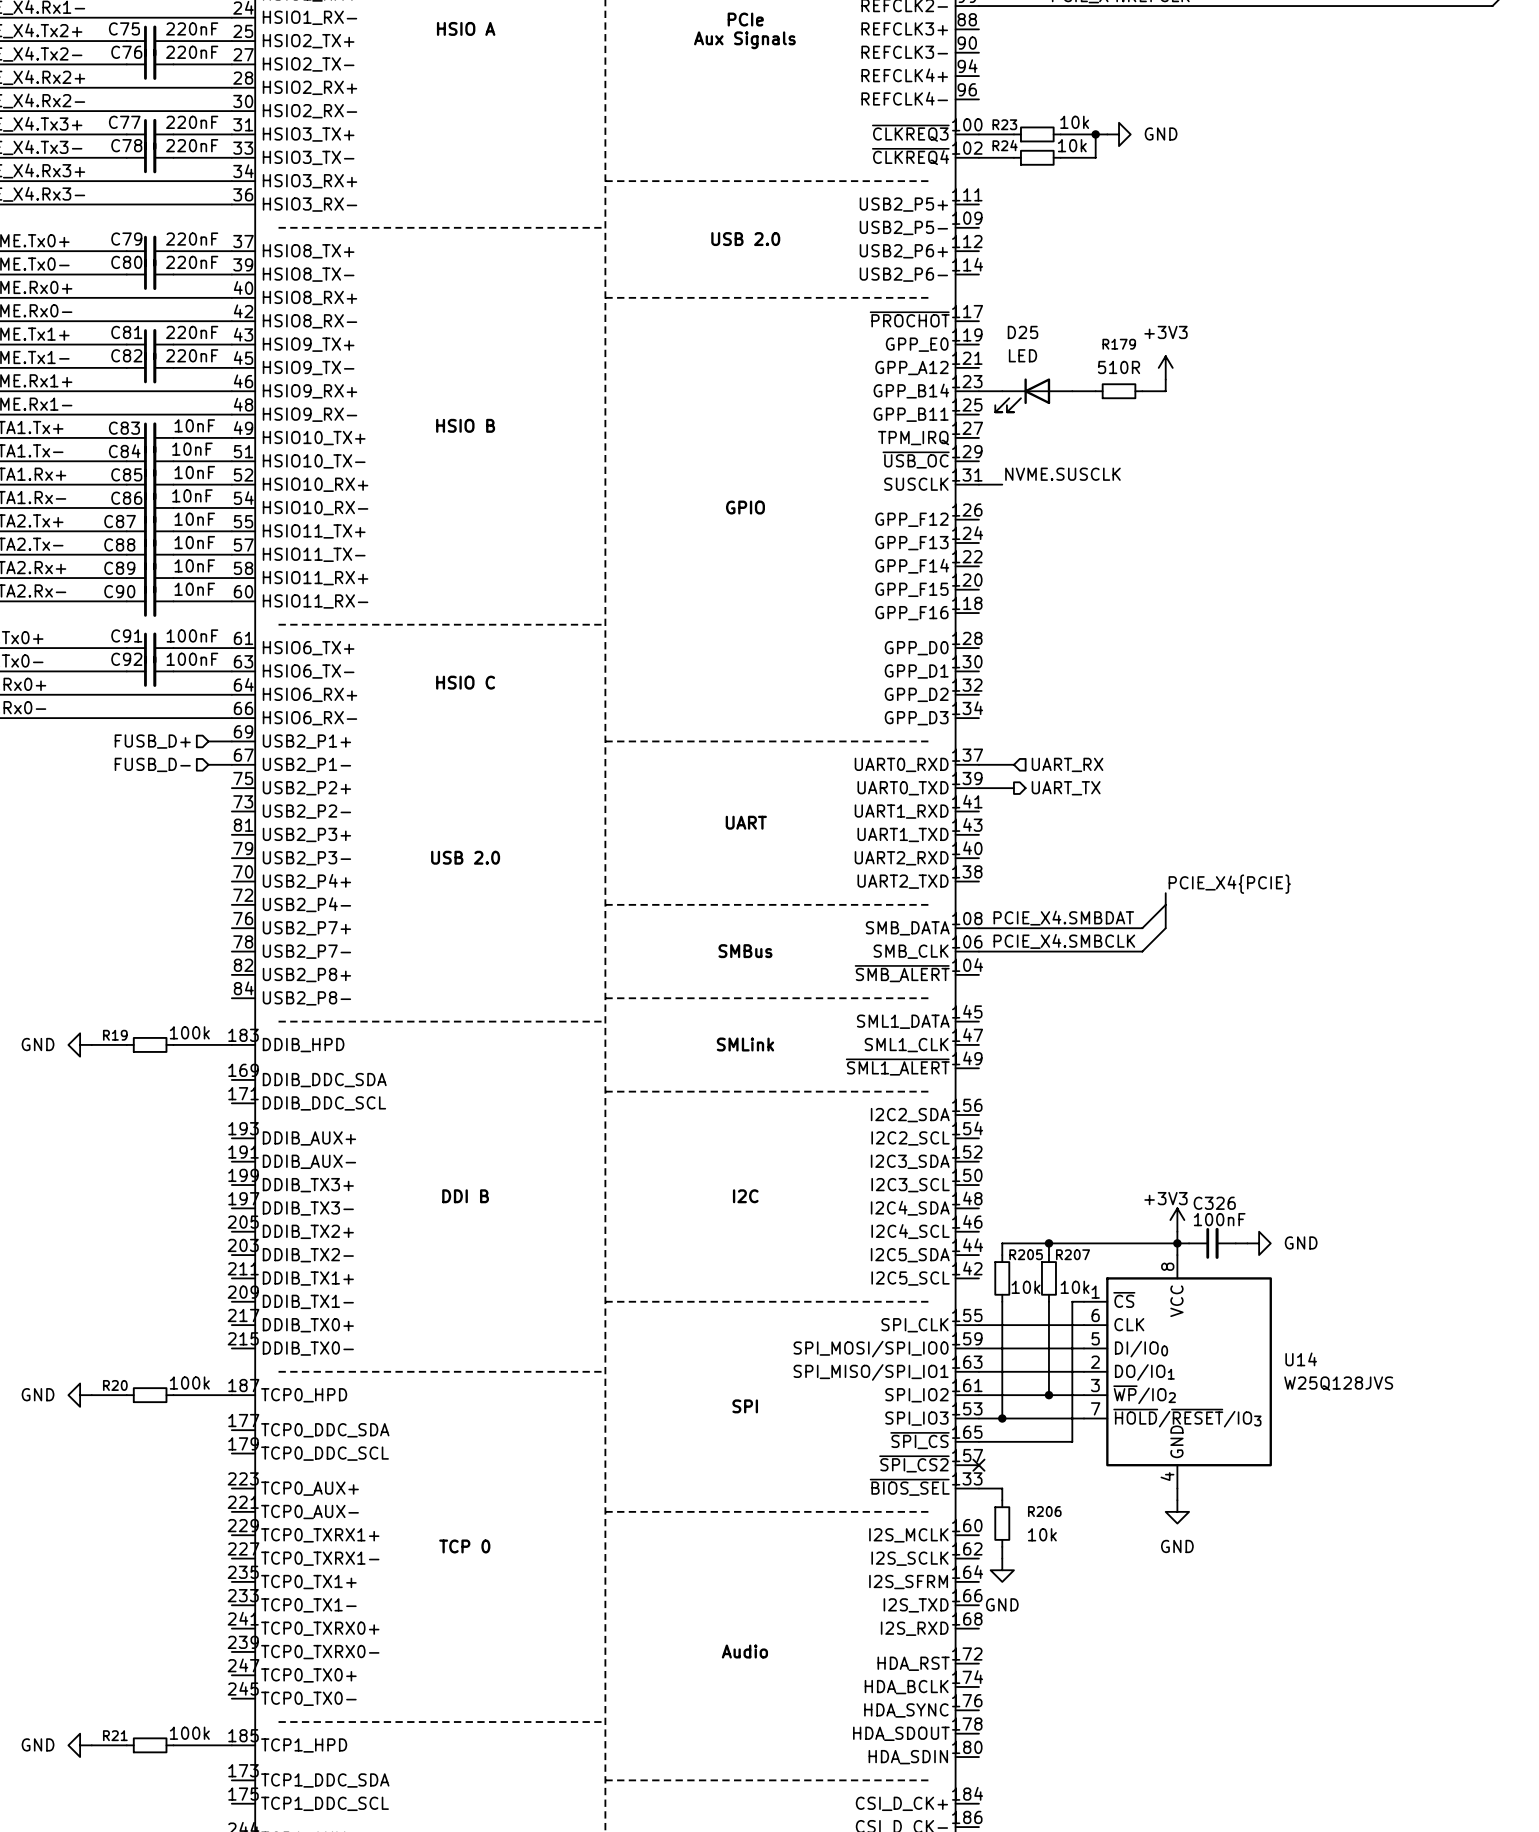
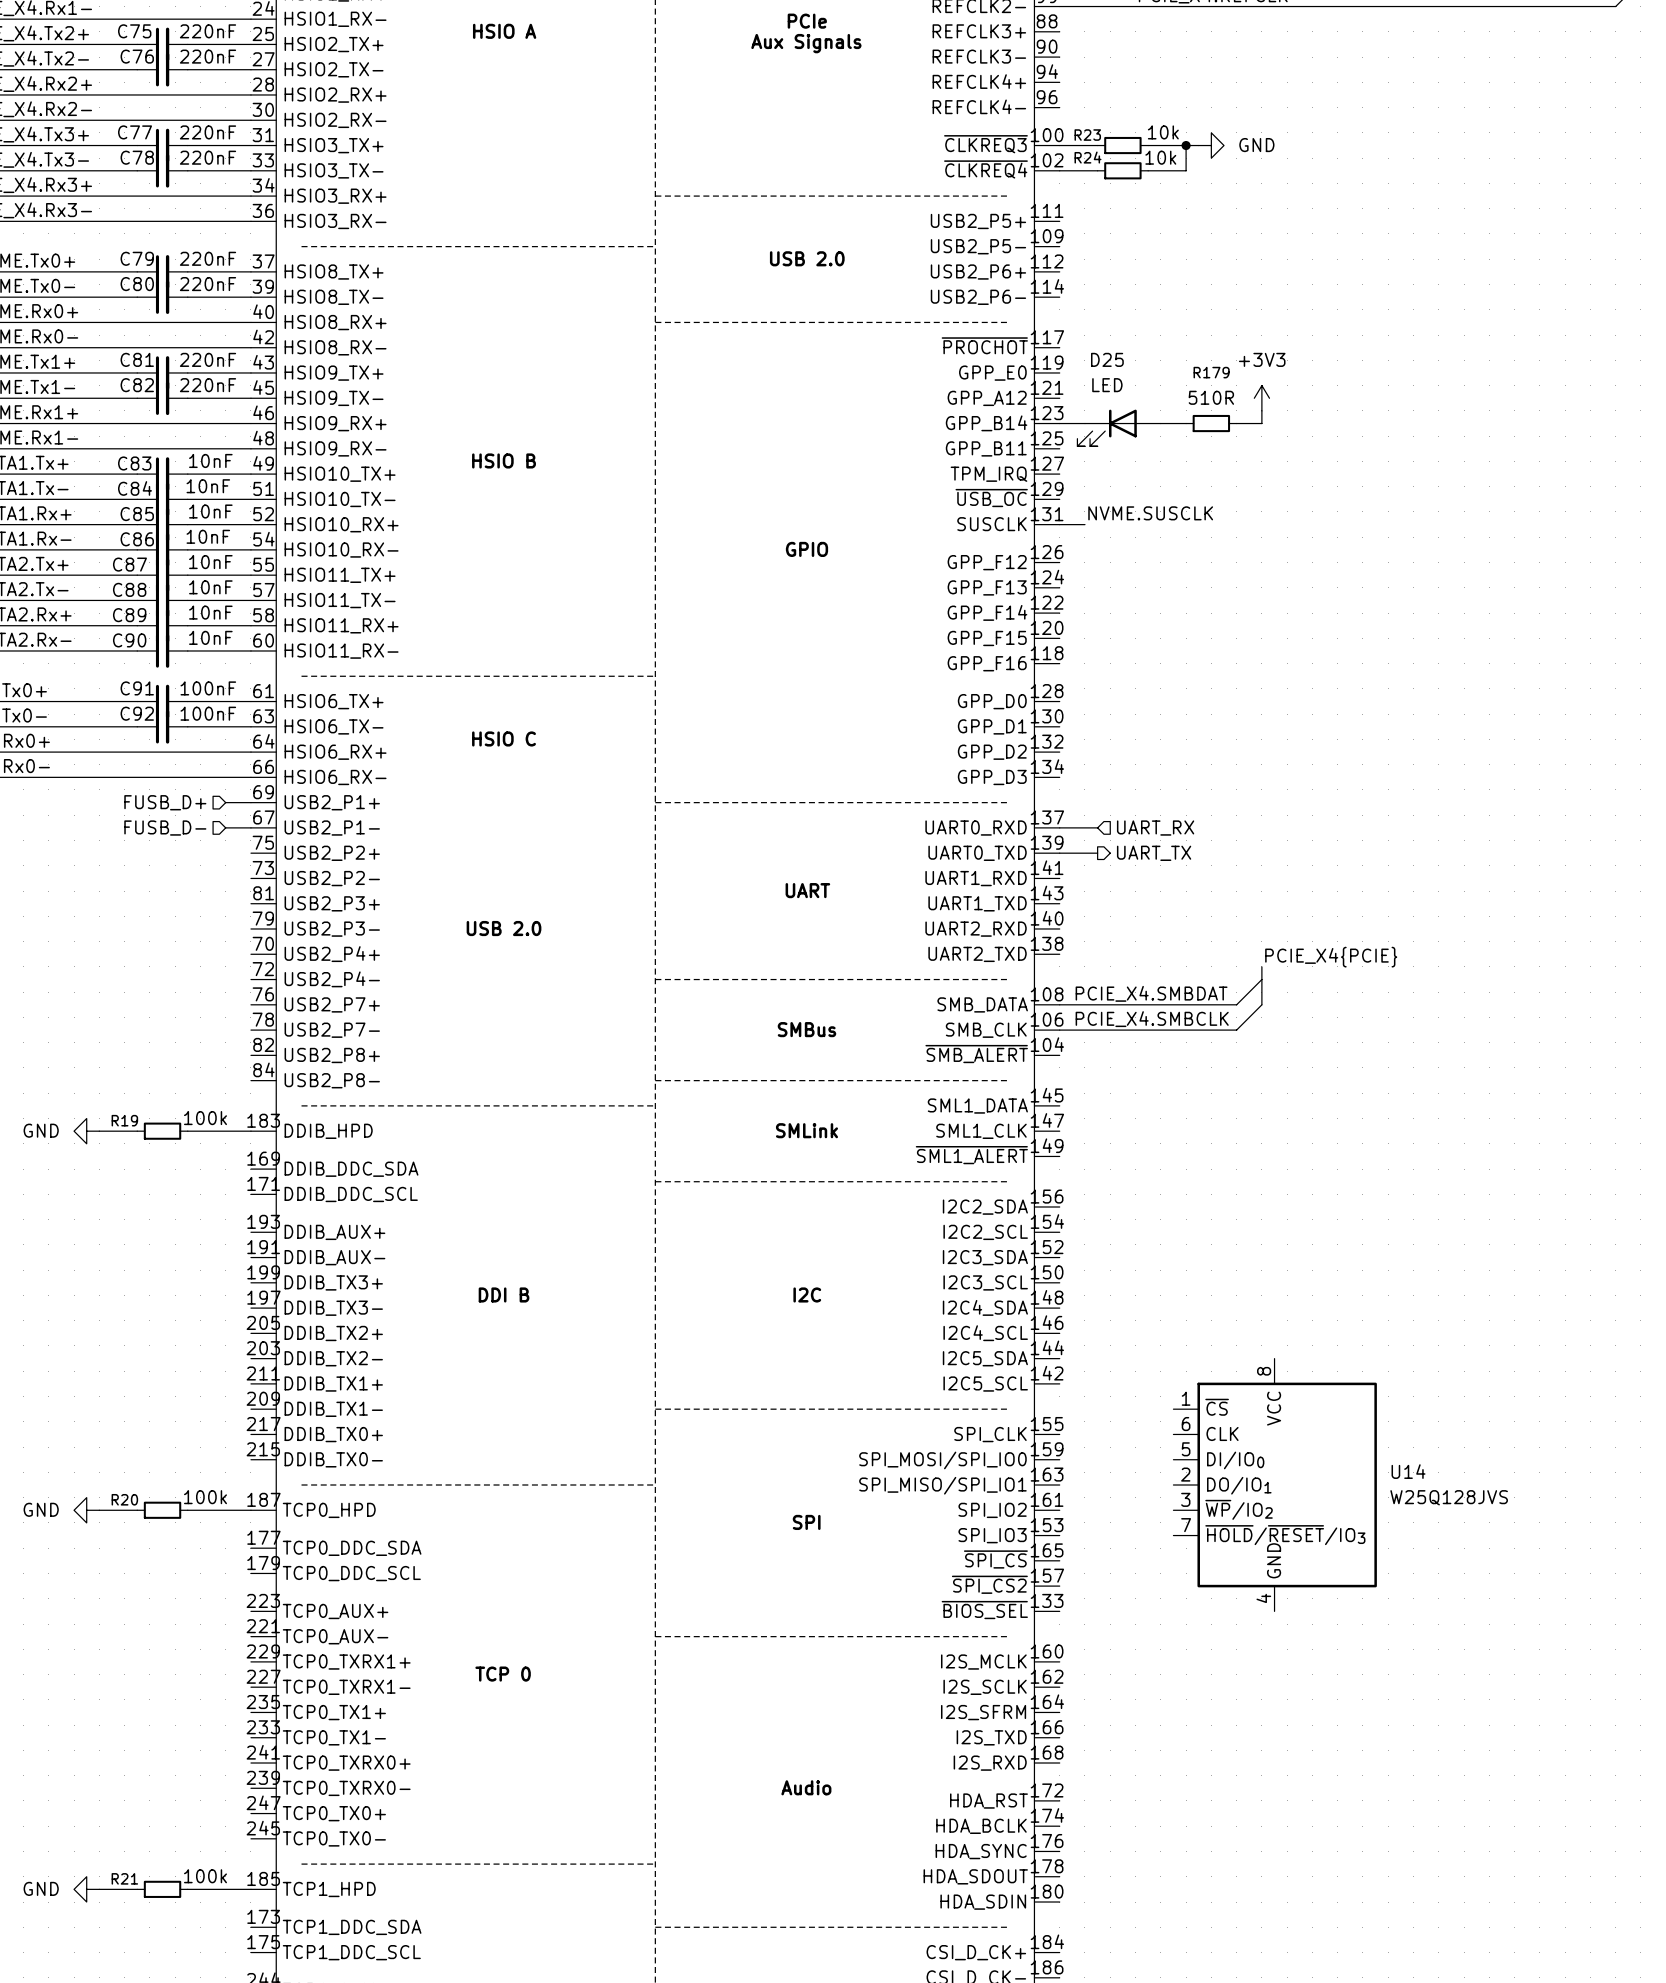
power symbol: +3V3 (1177, 1220) -> none
wire: (1177, 1231) (1177, 1255) -> none
wire: (1048, 1243) (1048, 1255) -> none
junction: (1048, 1243) -> none
junction: (1177, 1243) -> none
wire: (1189, 1243) (1002, 1243) (1002, 1255) -> none
C326: 100nF (1212, 1243) -> none
wire: (1235, 1243) (1247, 1243) -> none
power symbol: GND (1259, 1243) -> none
R205: 10k (1002, 1278) -> none
R207: 10k (1048, 1278) -> none
wire: (1002, 1301) (1002, 1418) -> none
wire: (1048, 1301) (1048, 1395) -> none
wire: (1084, 1301) (1072, 1301) (1072, 1441) (978, 1441) -> none
wire: (978, 1325) (1084, 1325) -> none
wire: (978, 1348) (1084, 1348) -> none
wire: (978, 1371) (1084, 1371) -> none
wire: (978, 1395) (1084, 1395) -> none
junction: (1048, 1395) -> none
wire: (978, 1418) (1084, 1418) -> none
junction: (1002, 1418) -> none
no-connect mark: (978, 1465) -> none
wire: (978, 1488) (1002, 1488) (1002, 1500) -> none
wire: (1177, 1488) (1177, 1500) -> none
power symbol: GND (1177, 1511) -> none
R206: 10k (1002, 1523) -> none
wire: (1002, 1546) (1002, 1558) -> none
power symbol: GND (1002, 1570) -> none

